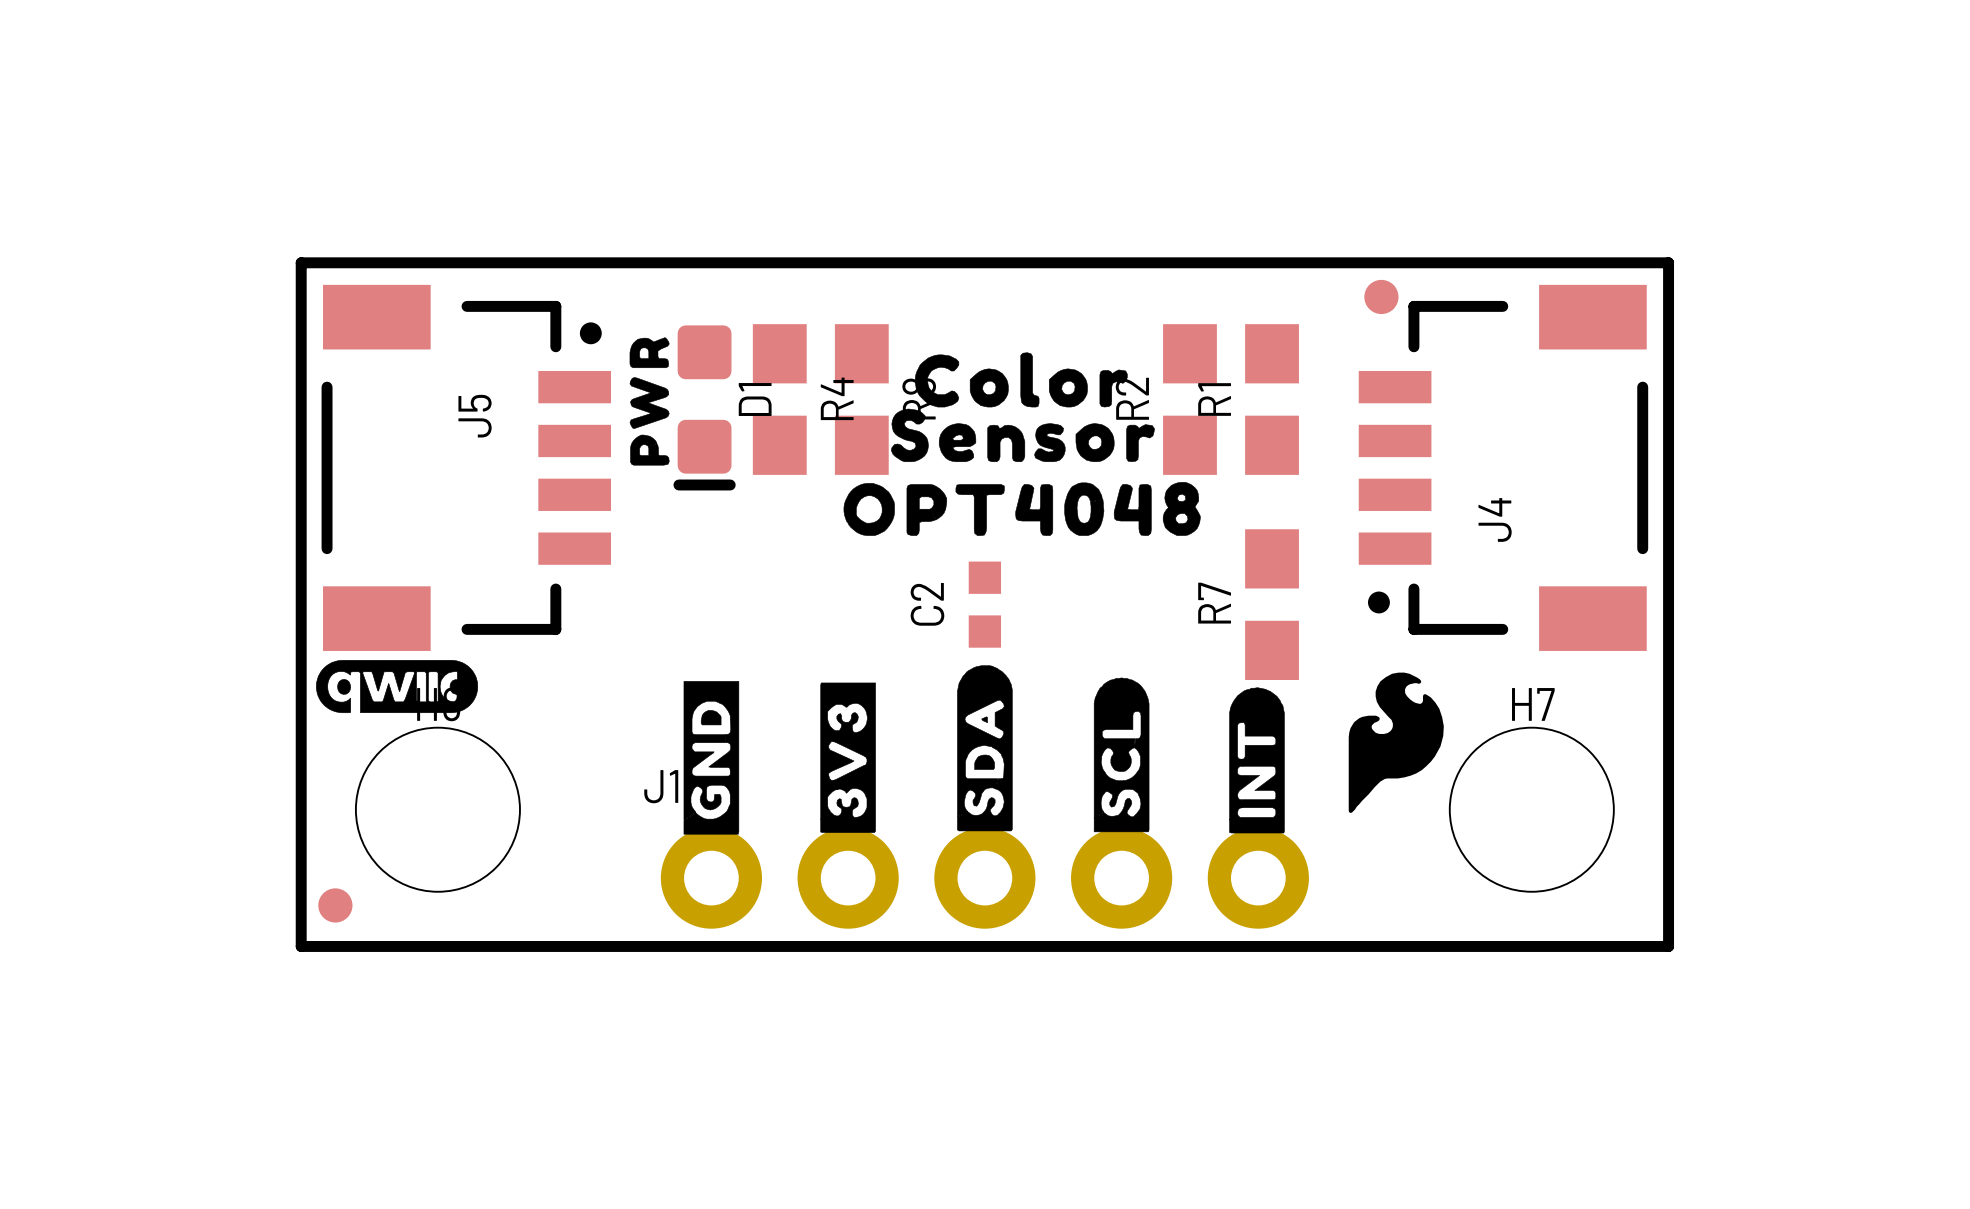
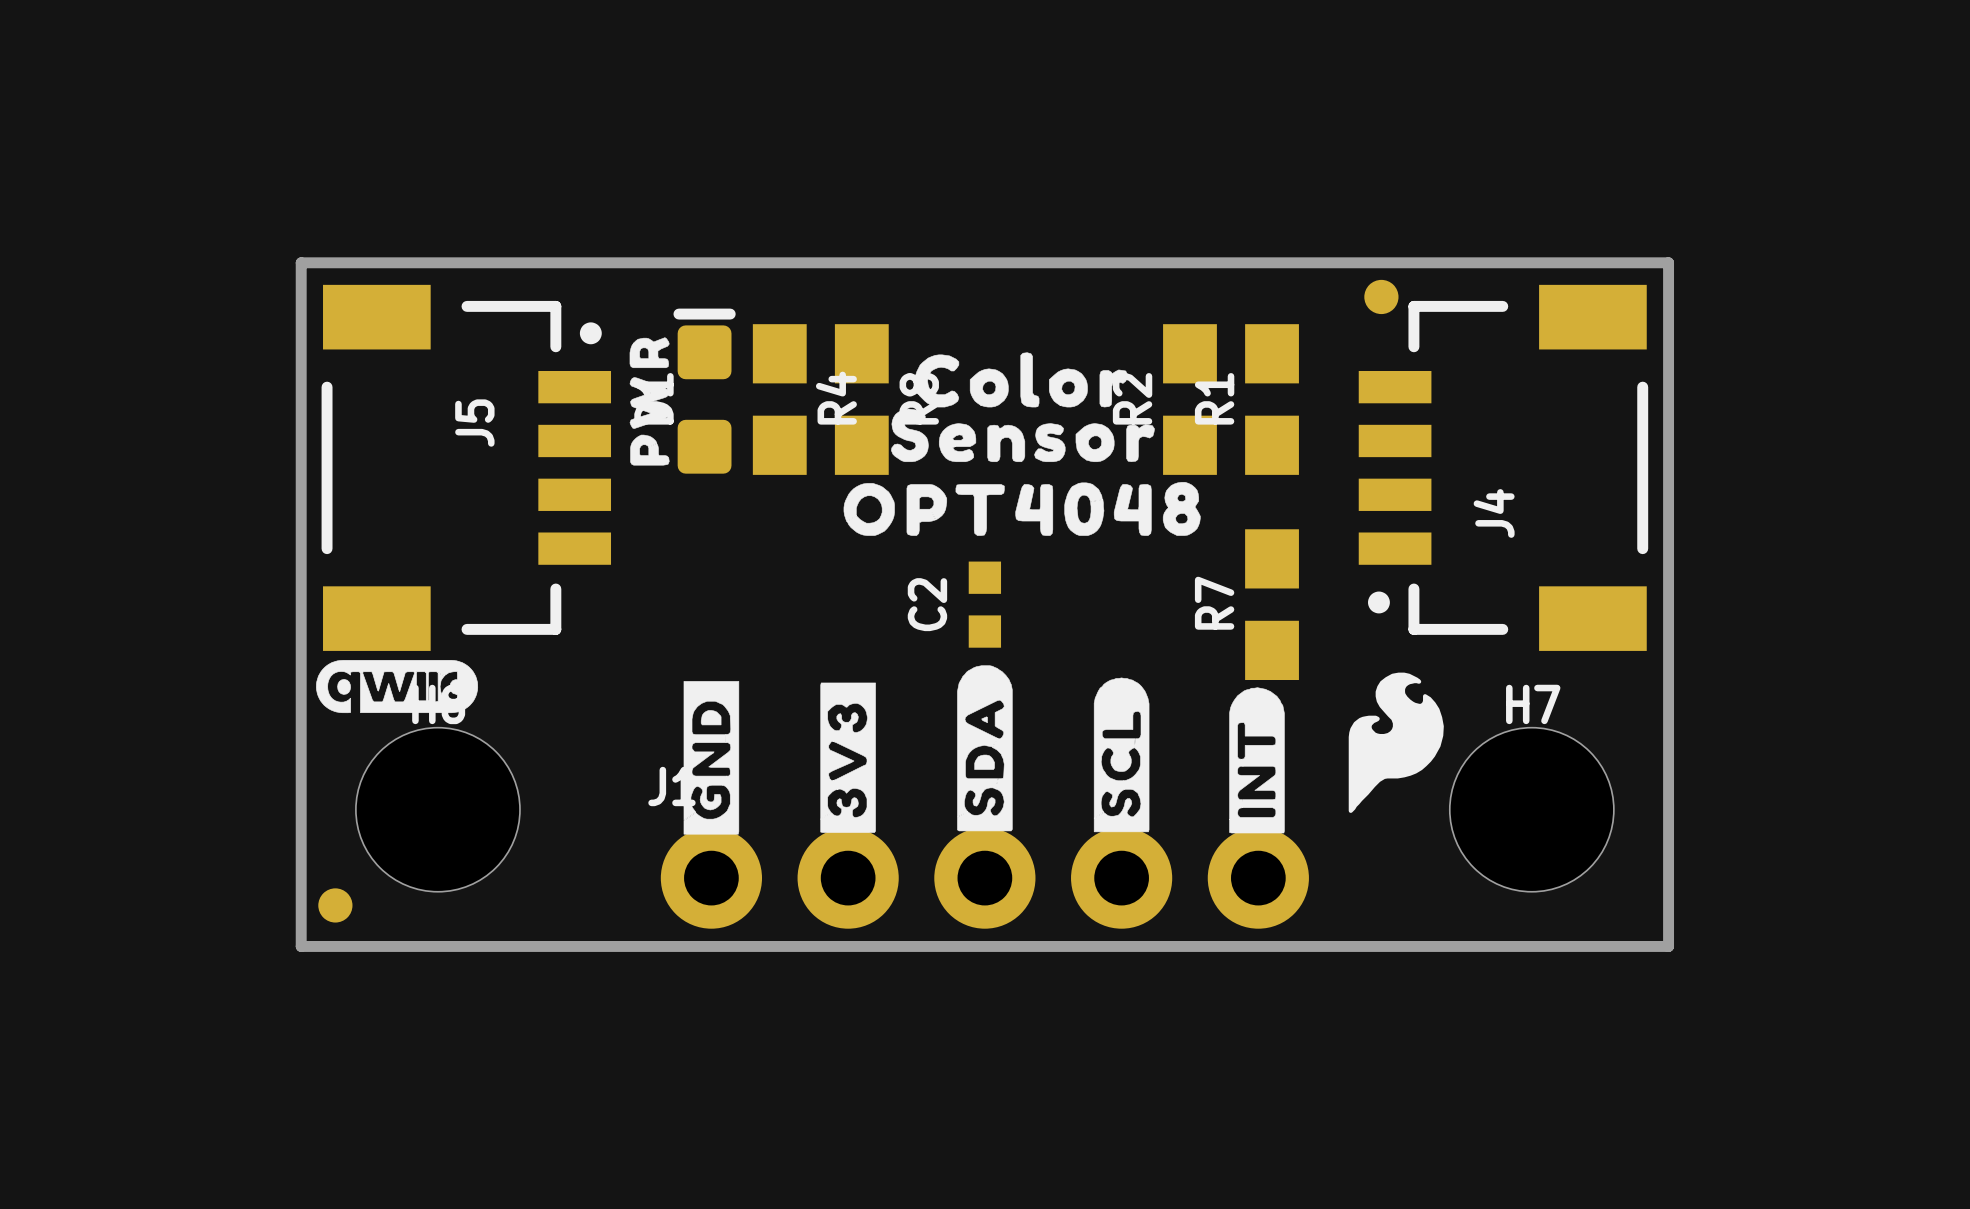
D1 rotation: 0° (704, 407) -> 180° (704, 391)

